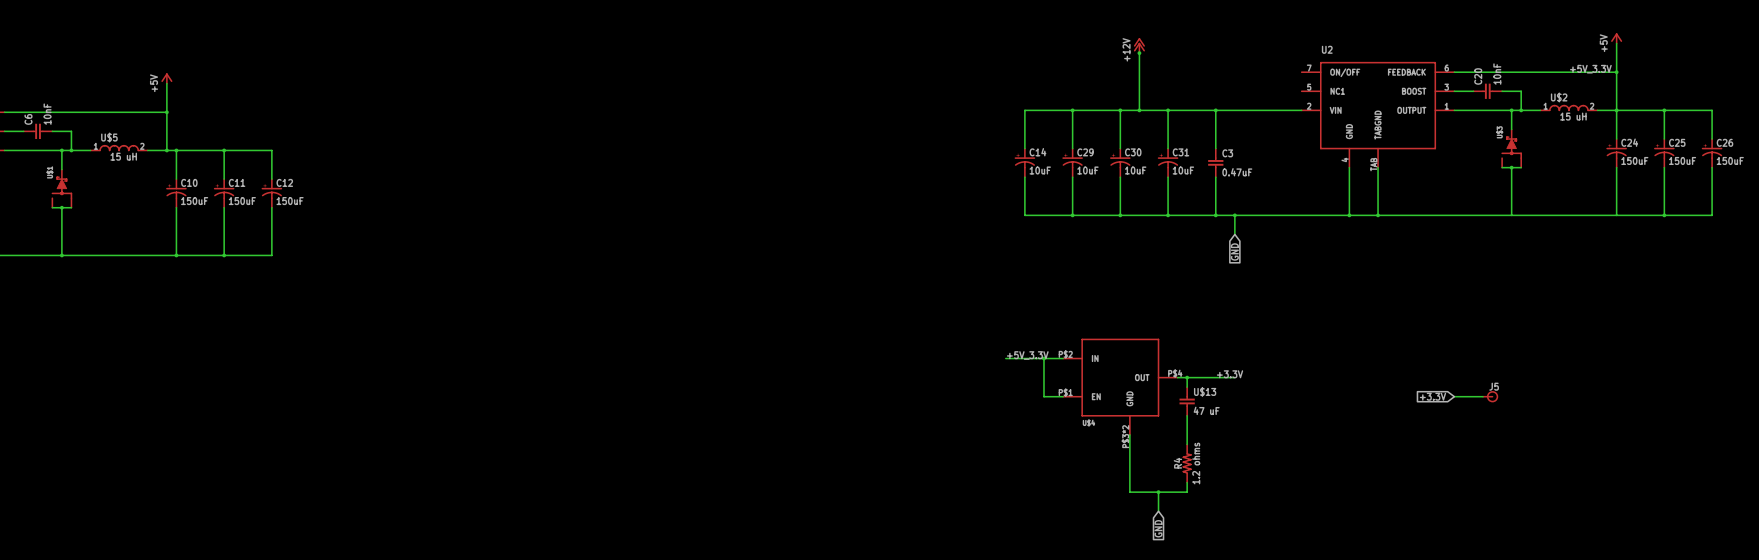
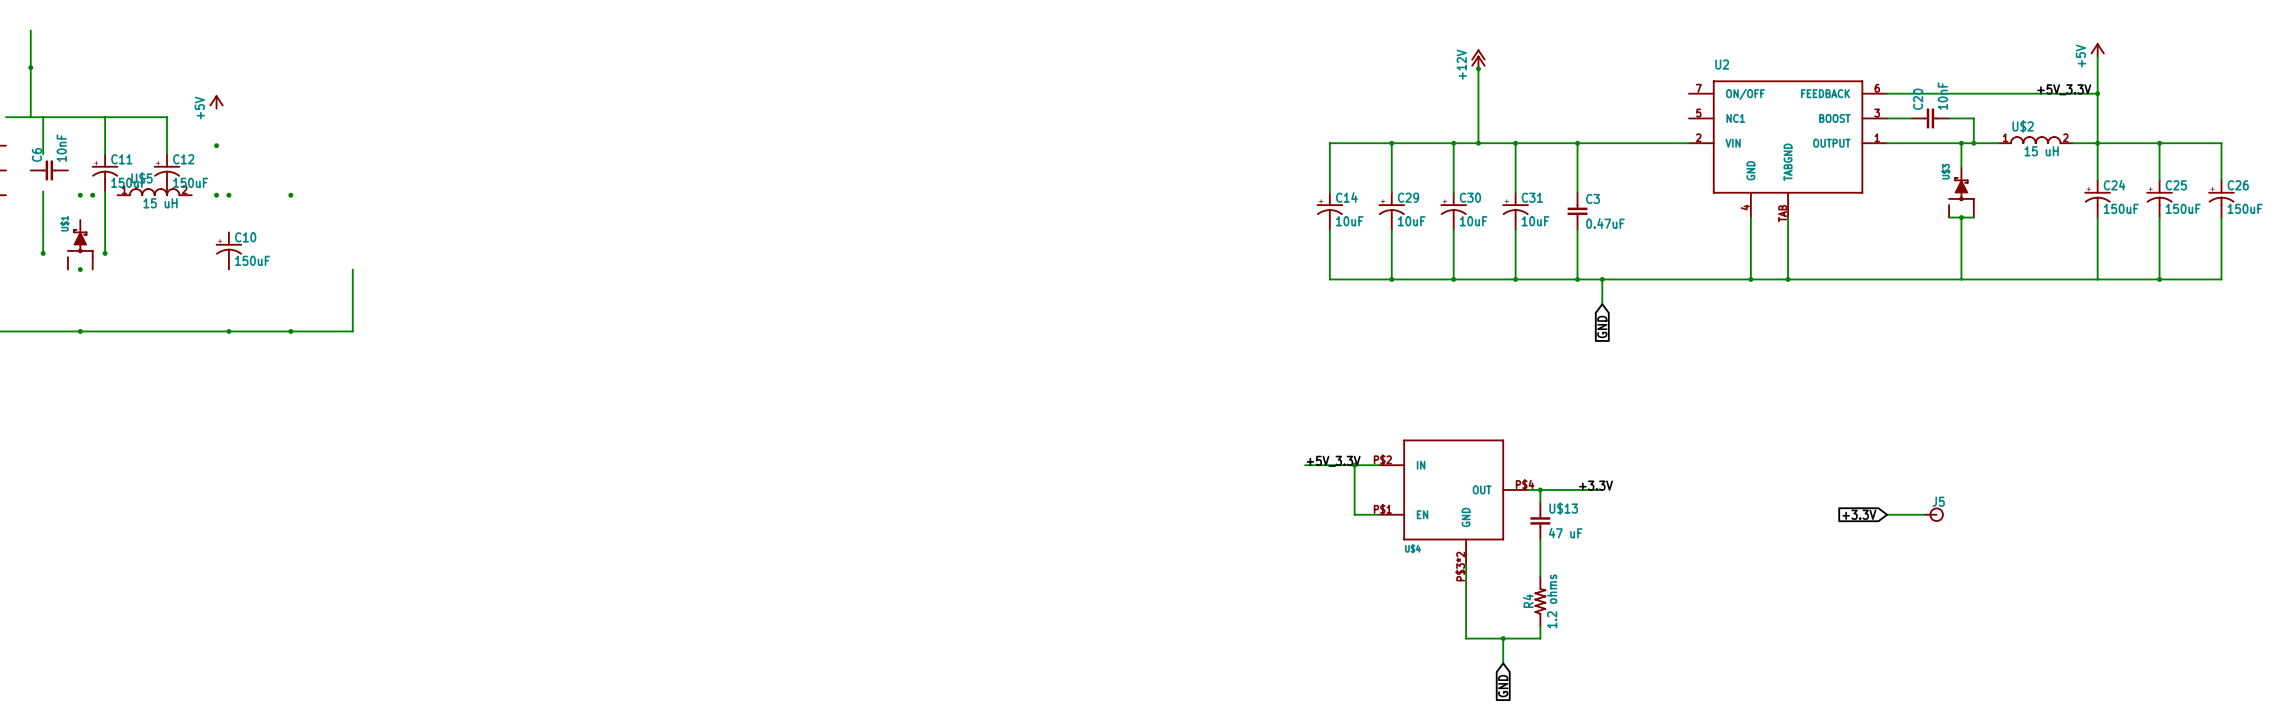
wire: none -> (30, 30) (30, 117)
junction: none -> (30, 67)
wire: (166, 83) (166, 150) -> none
wire: none -> (6, 117) (167, 117) (167, 154)
wire: none -> (43, 117) (43, 154)
wire: none -> (105, 117) (105, 154)
wire: (4, 112) (166, 112) -> none
wire: (4, 131) (23, 131) -> none
wire: (52, 131) (71, 131) (71, 150) -> none
wire: none -> (43, 191) (43, 253)
wire: (4, 150) (90, 150) -> none
wire: (61, 150) (61, 169) -> none
wire: (147, 150) (271, 150) (271, 179) -> none
wire: (176, 150) (176, 179) -> none
wire: (224, 150) (224, 179) -> none
C11 position: (224, 193) -> (105, 172)
C12 position: (271, 193) -> (167, 172)
junction: none -> (43, 253)
junction: none -> (105, 253)
wire: (52, 207) (71, 207) -> none
wire: (61, 207) (61, 255) -> (105, 191) (105, 253)
wire: (176, 207) (176, 255) -> none
wire: (224, 207) (224, 255) -> none

